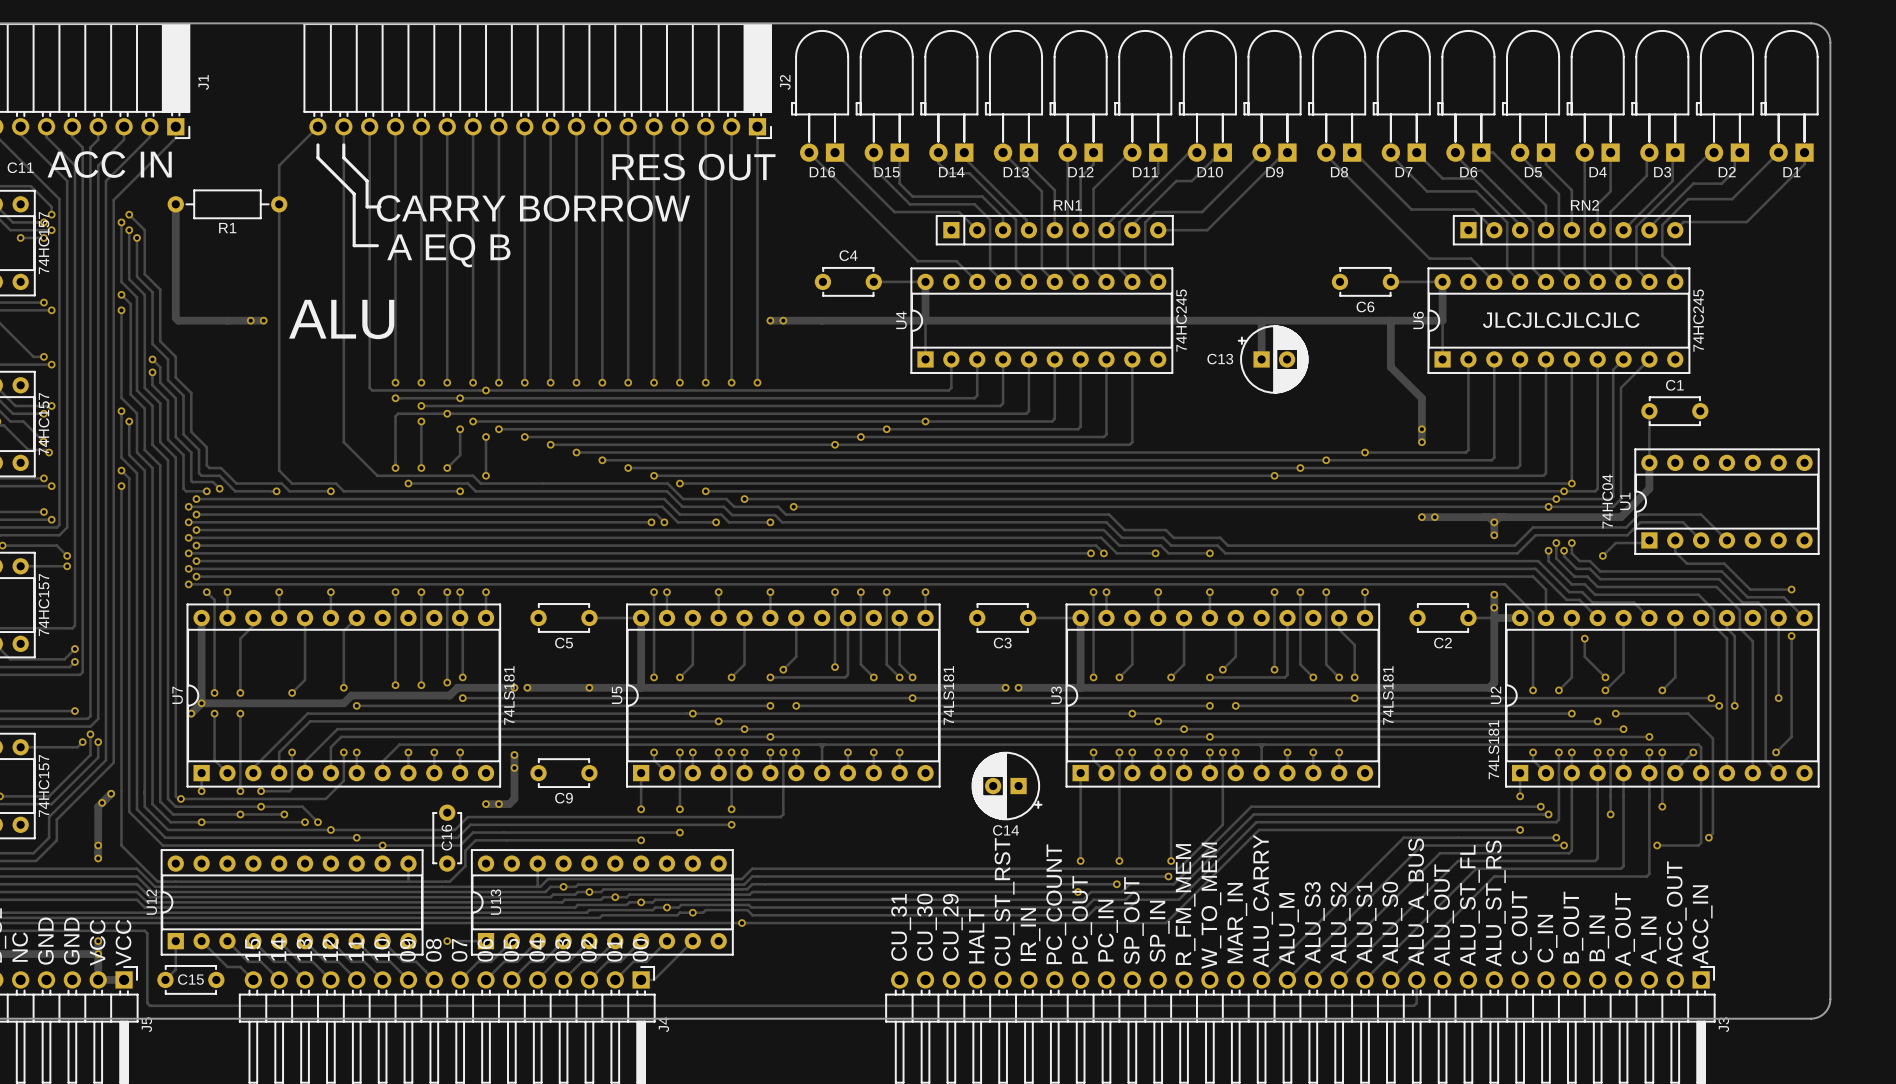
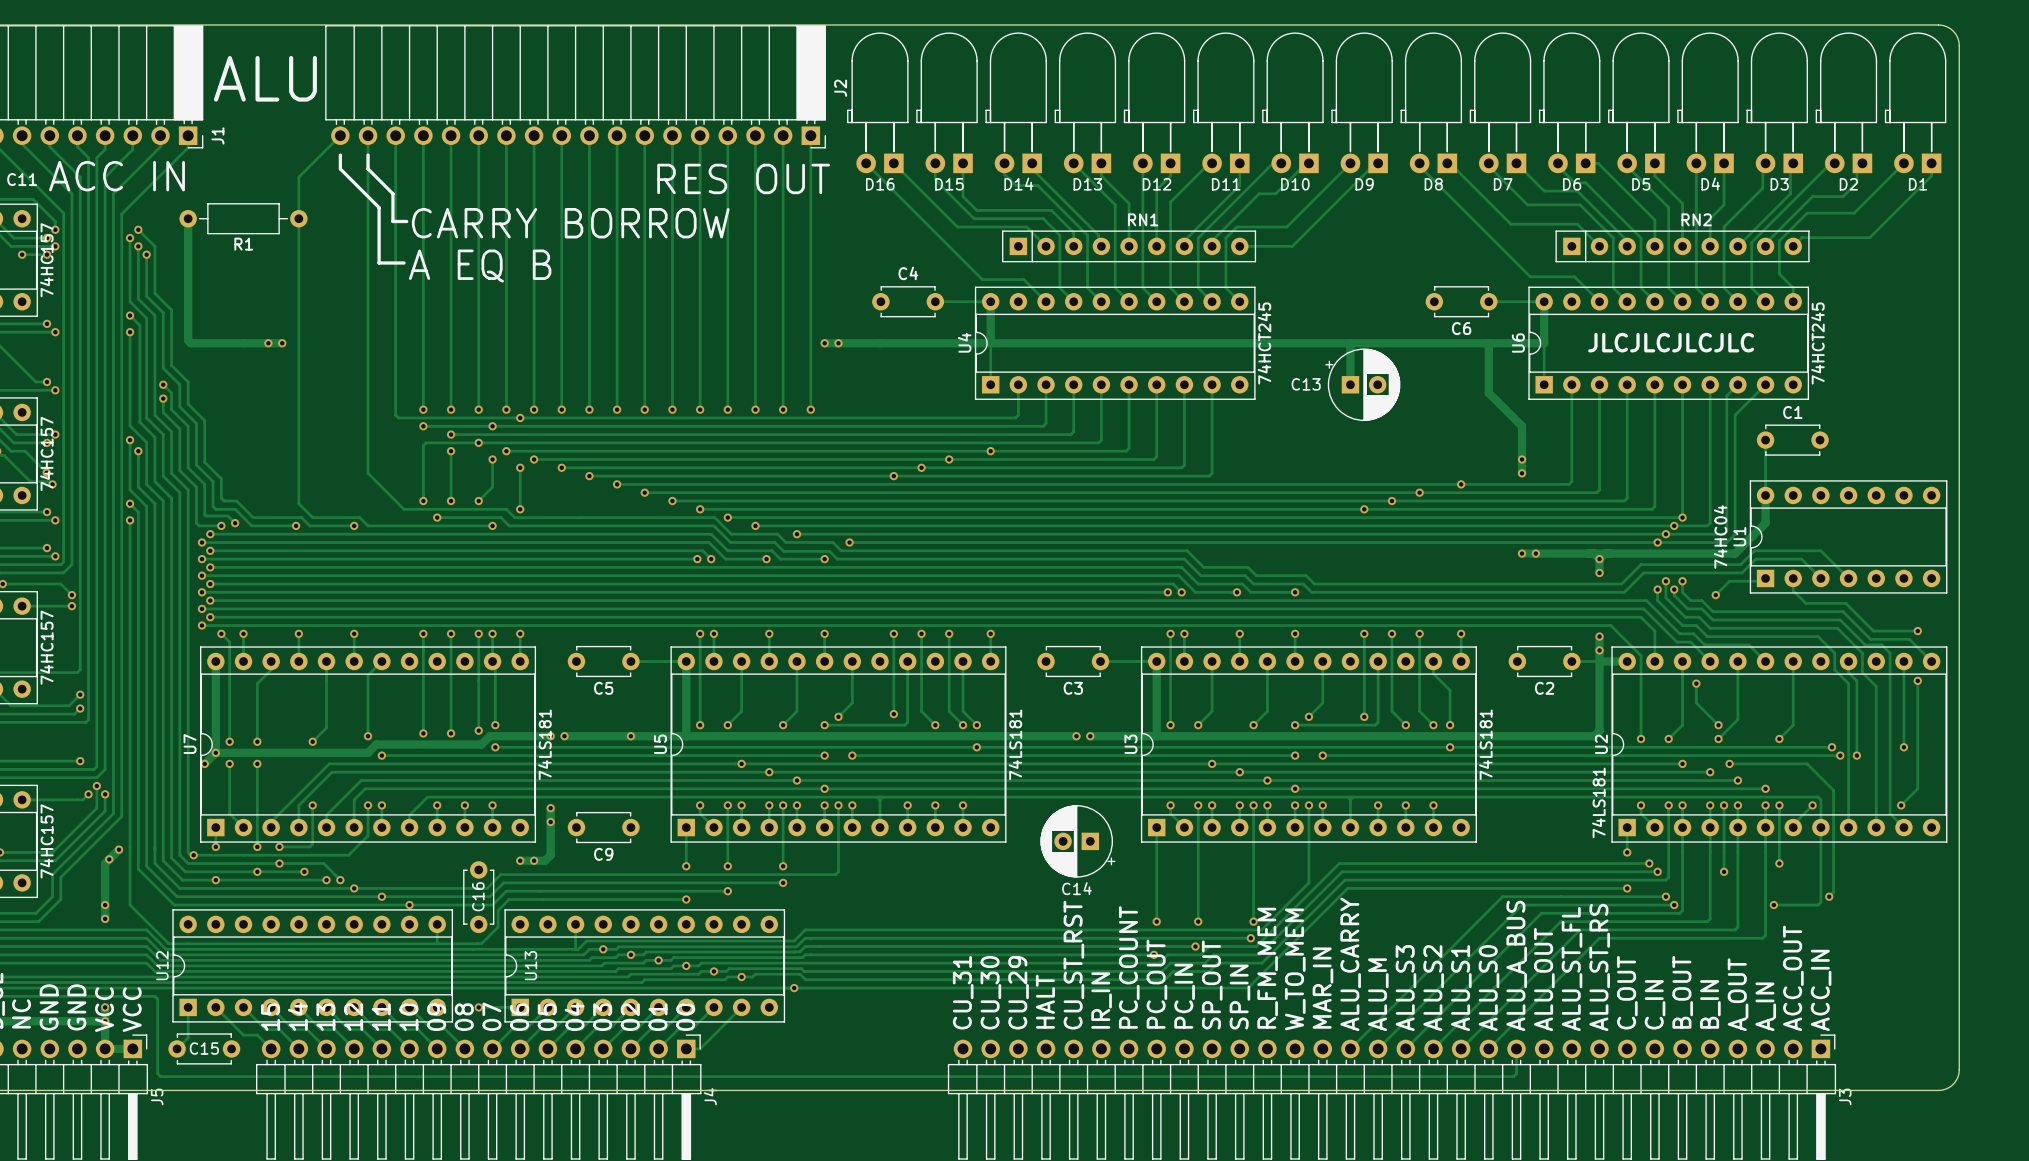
text: none -> ALU (265, 78)
J1 name position: J1 (203, 82) -> J1 (217, 135)
text: ALU (341, 319) -> none
U4 value: 74HC245 (1181, 320) -> 74HCT245 (1264, 343)
U6 value: 74HC245 (1698, 320) -> 74HCT245 (1817, 343)

